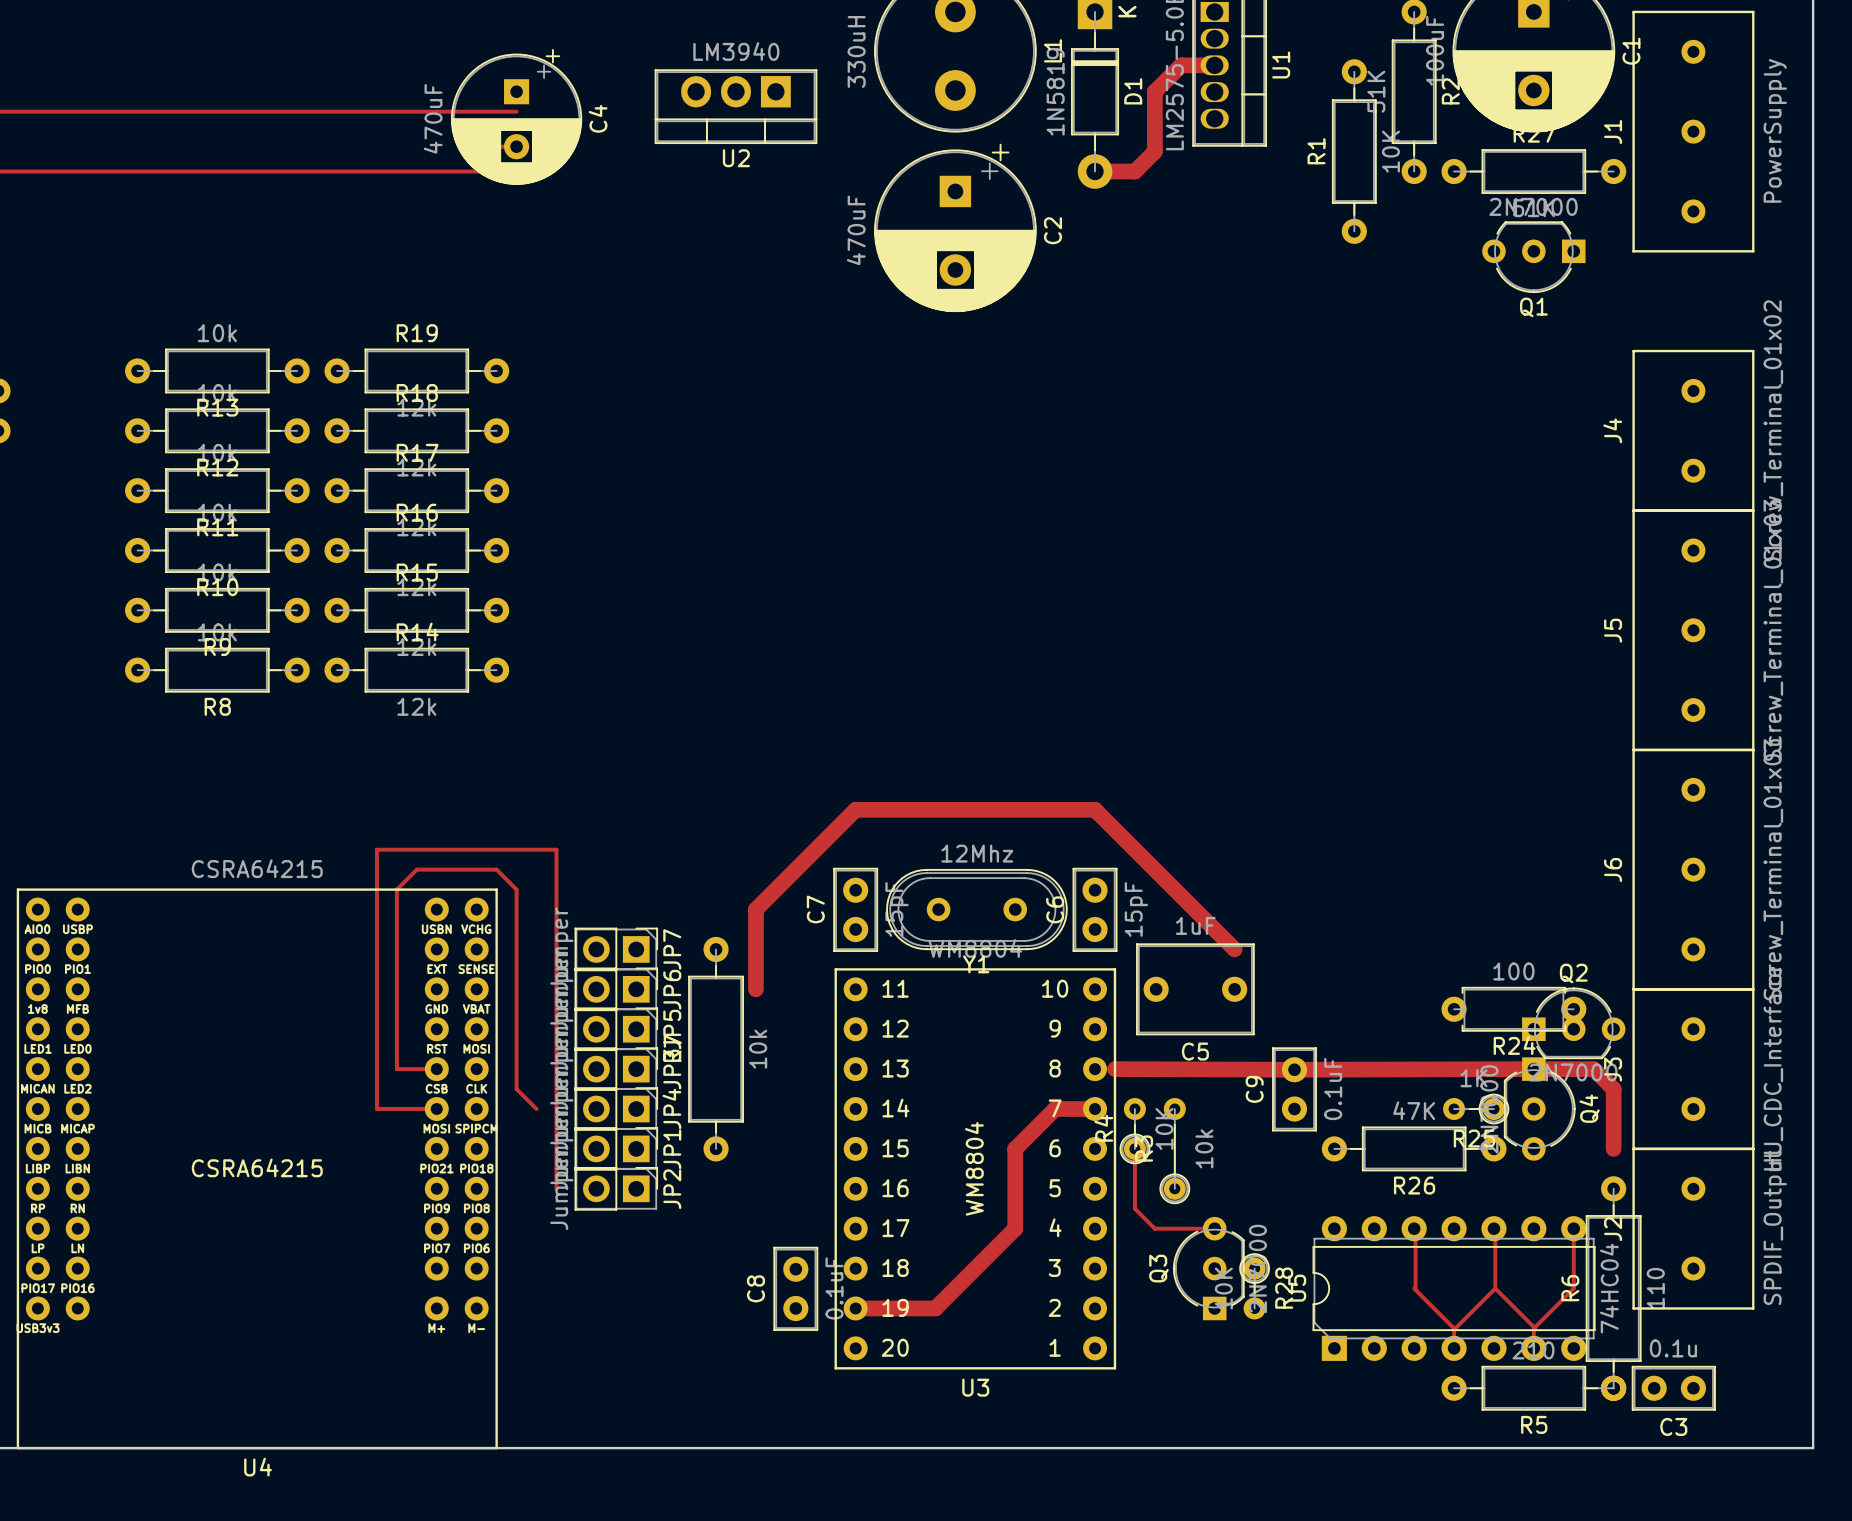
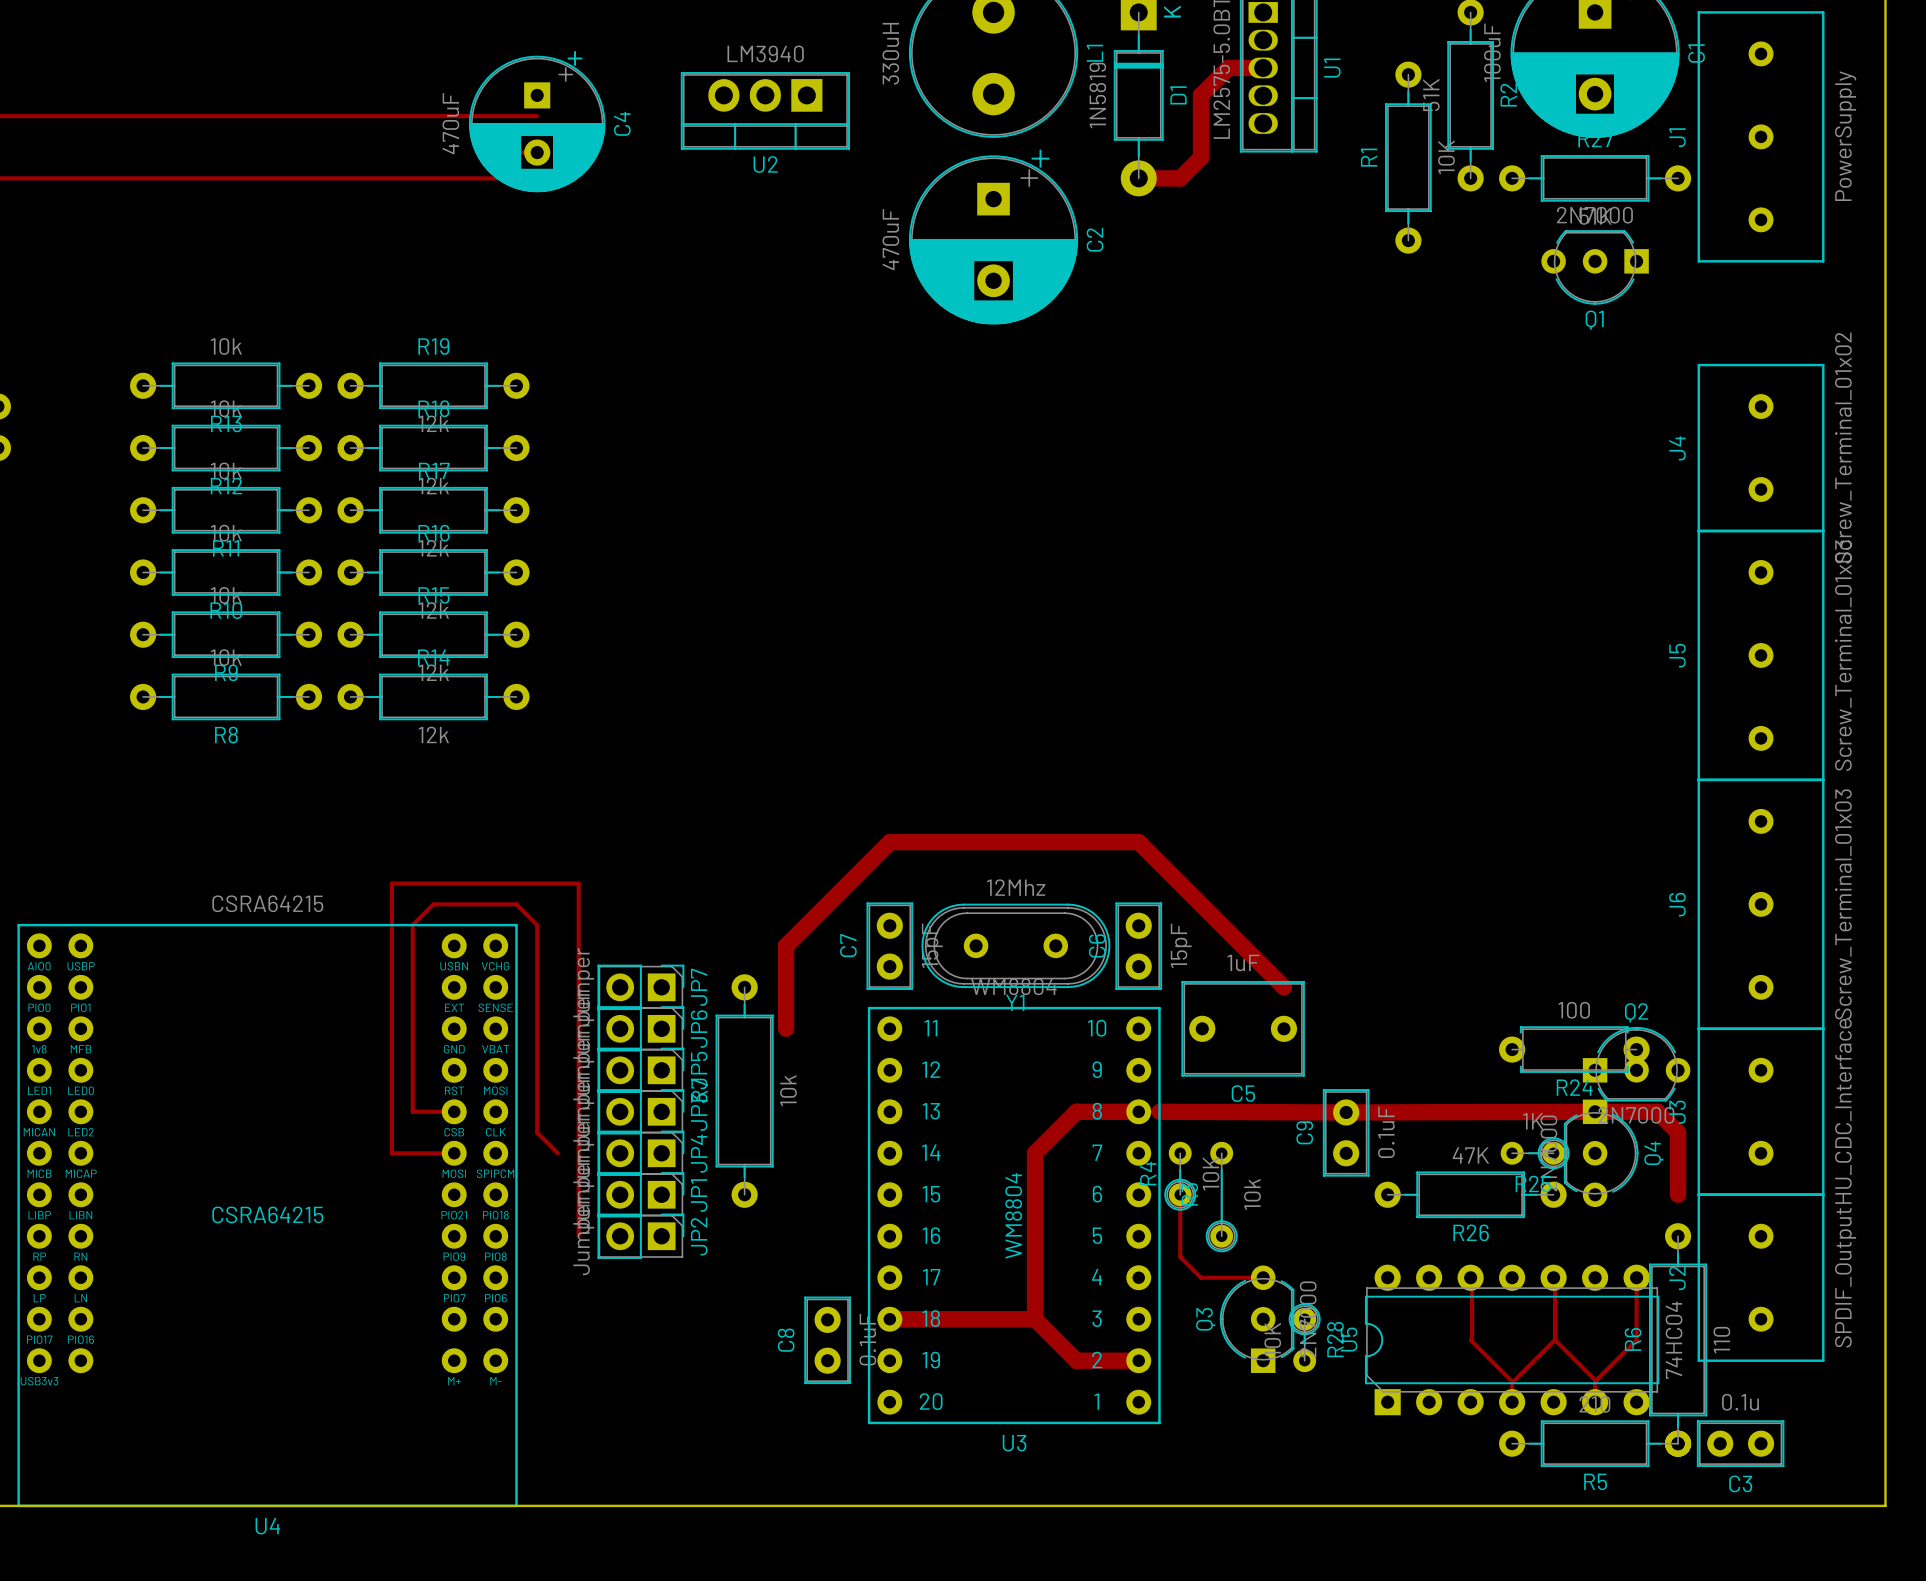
track: none -> (1138, 1111) (1076, 1111) (1035, 1153) (1035, 1319)
track: (1095, 1109) (1055, 1109) (1015, 1148) (1015, 1228) (935, 1308) (855, 1308) -> none
track: none -> (889, 1319) (1035, 1319)
track: none -> (1035, 1319) (1076, 1360) (1138, 1360)

